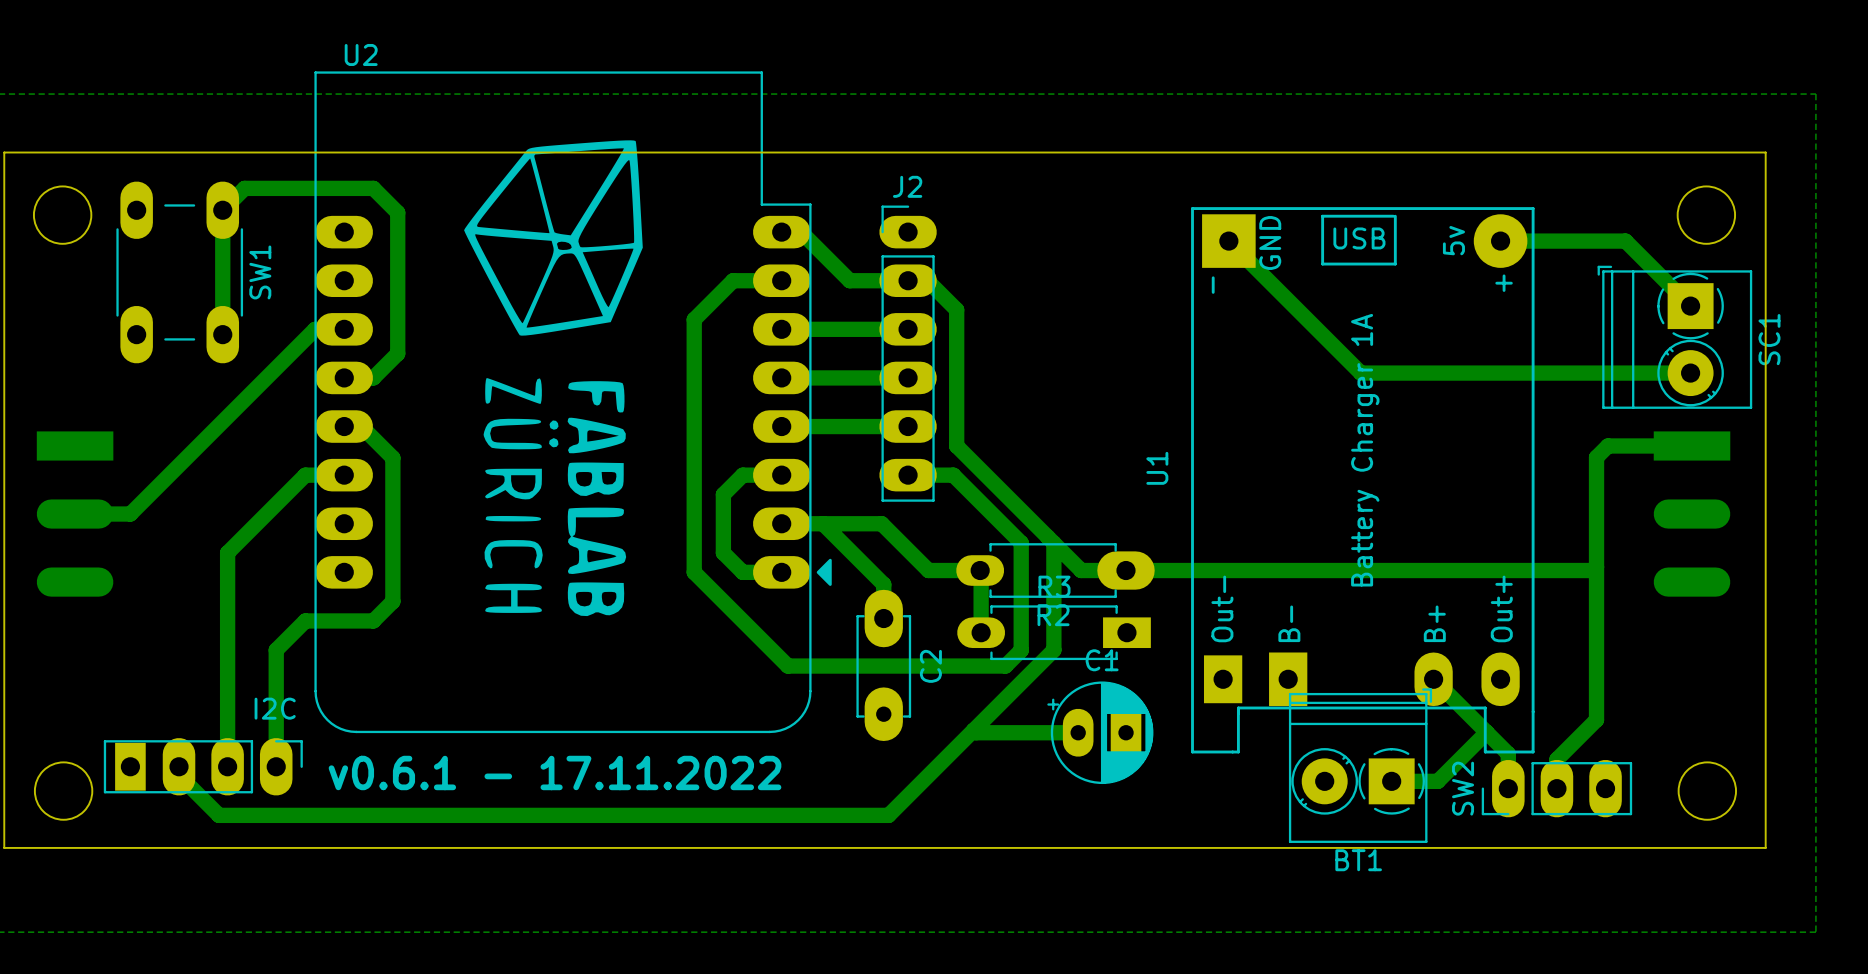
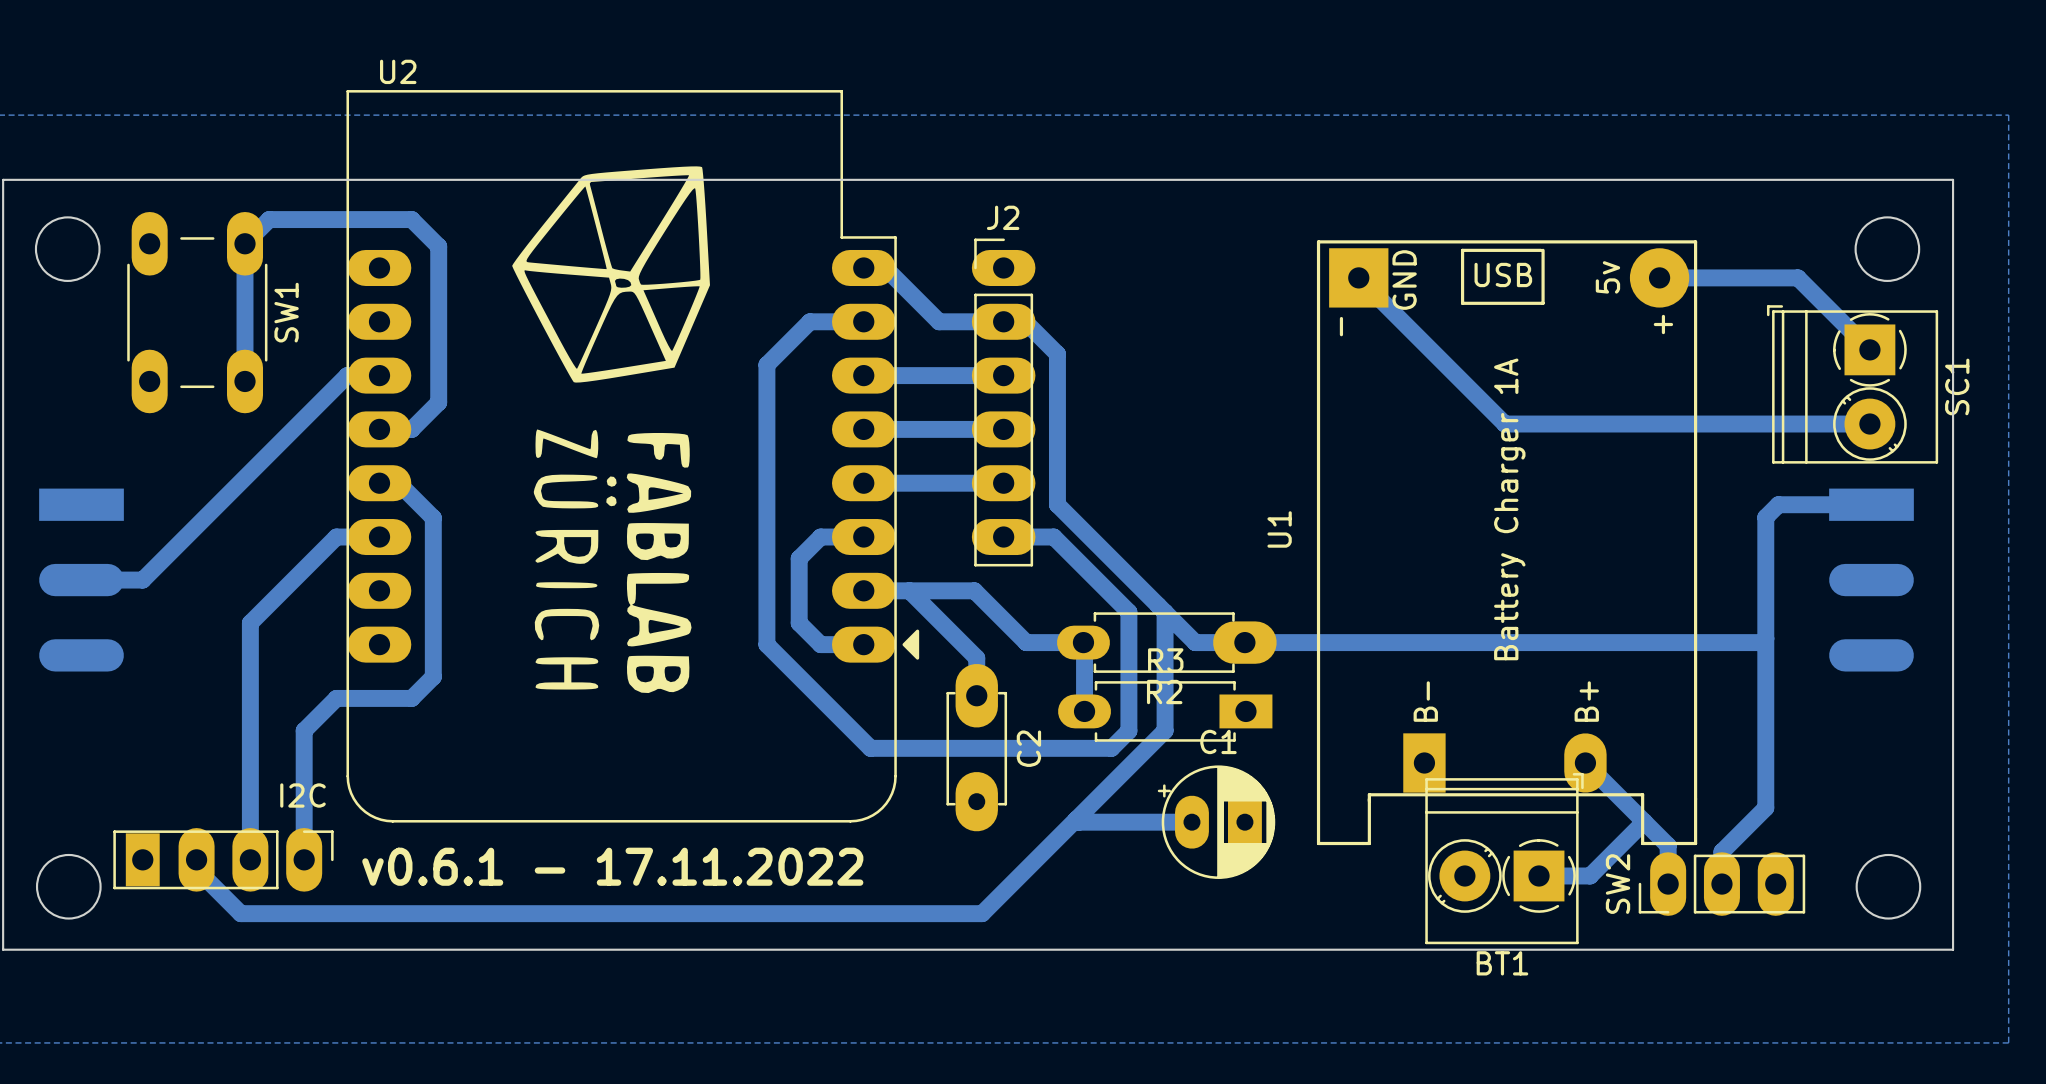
U1 footprint: [1191, 207, 1535, 754] -> [1316, 240, 1698, 846]

